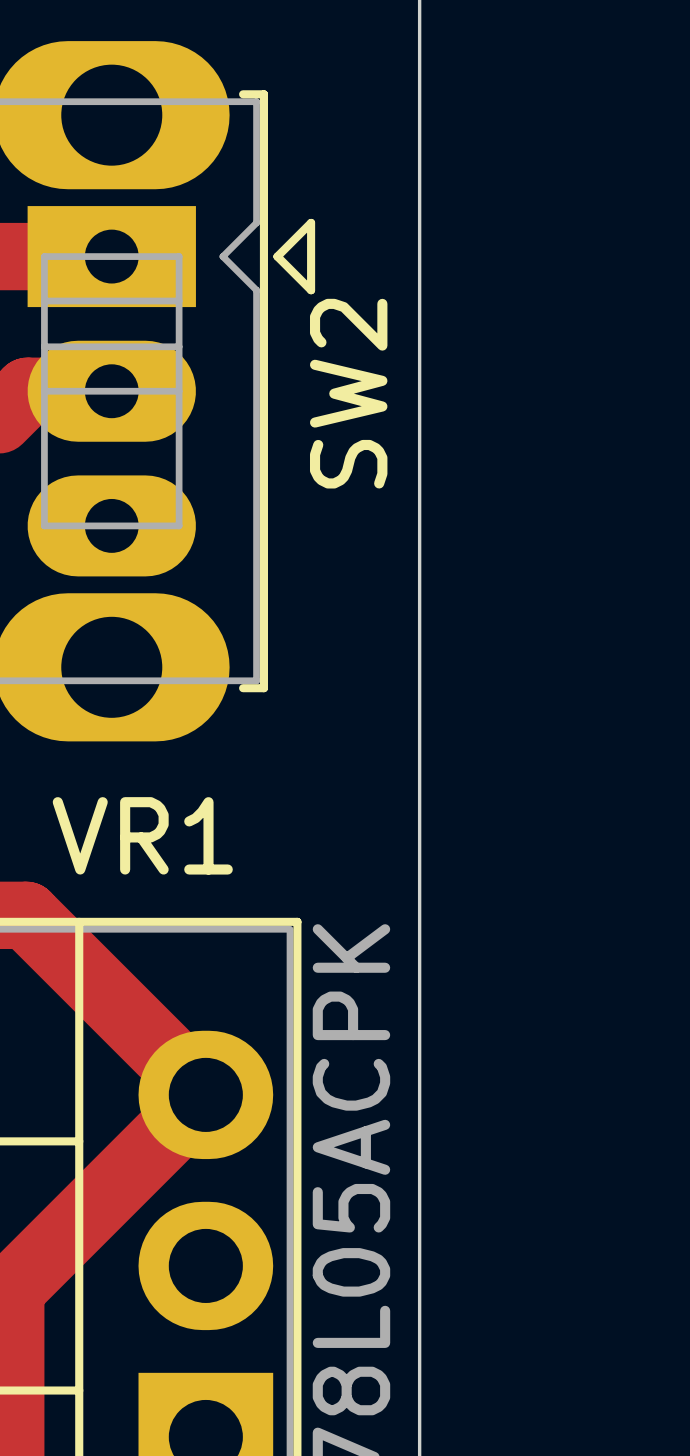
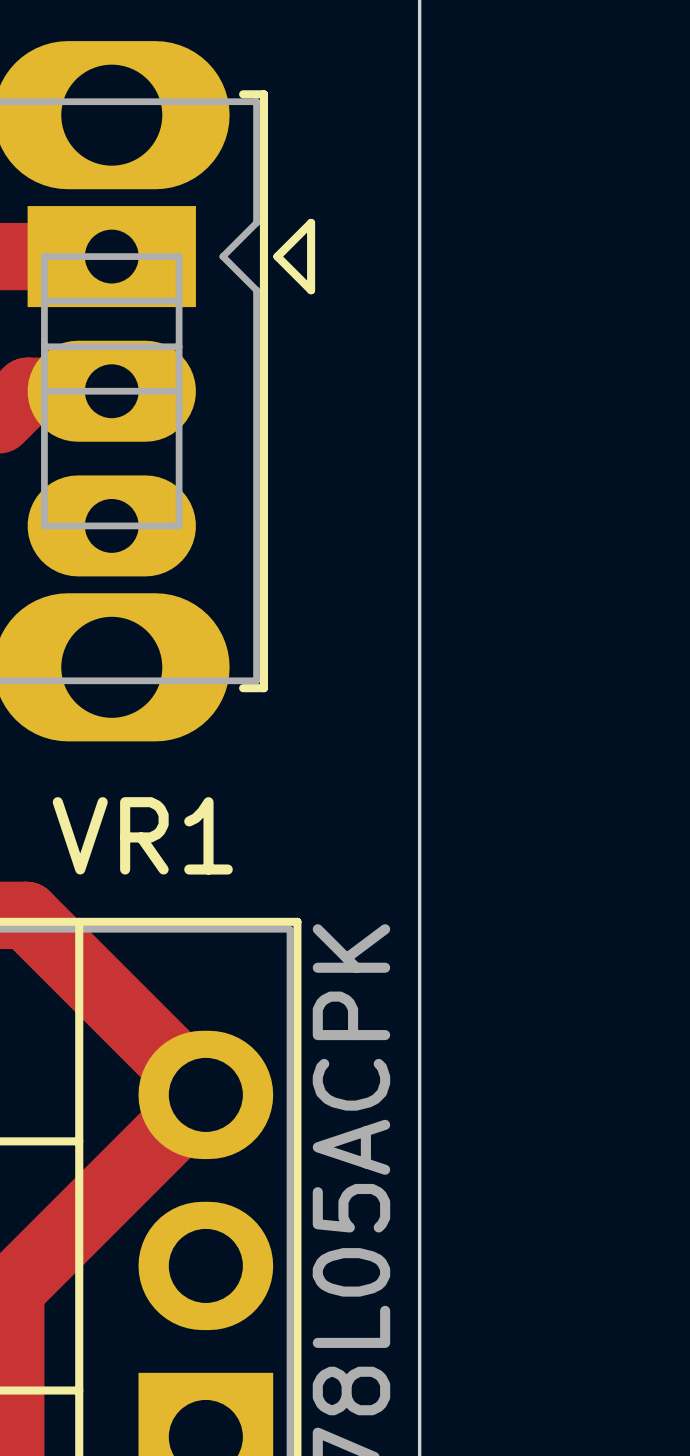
SW2 name: SW2 (348, 393) -> none

